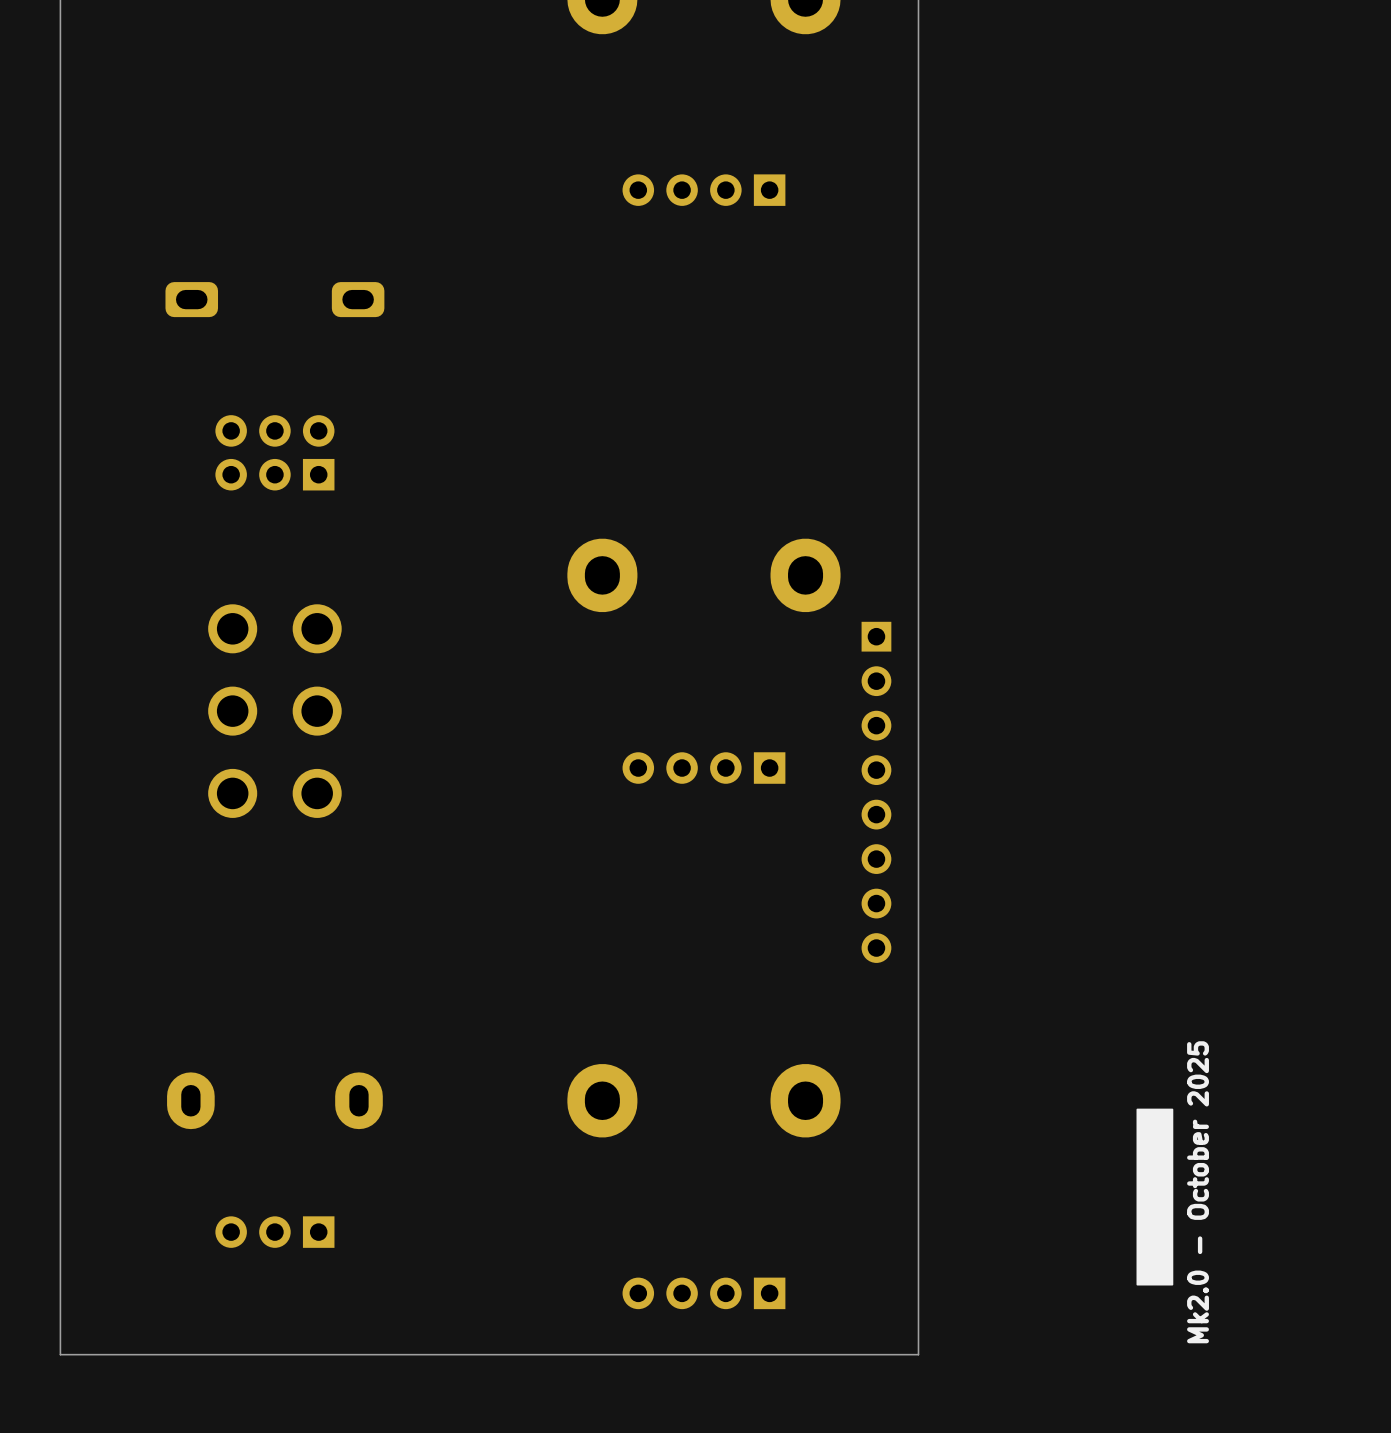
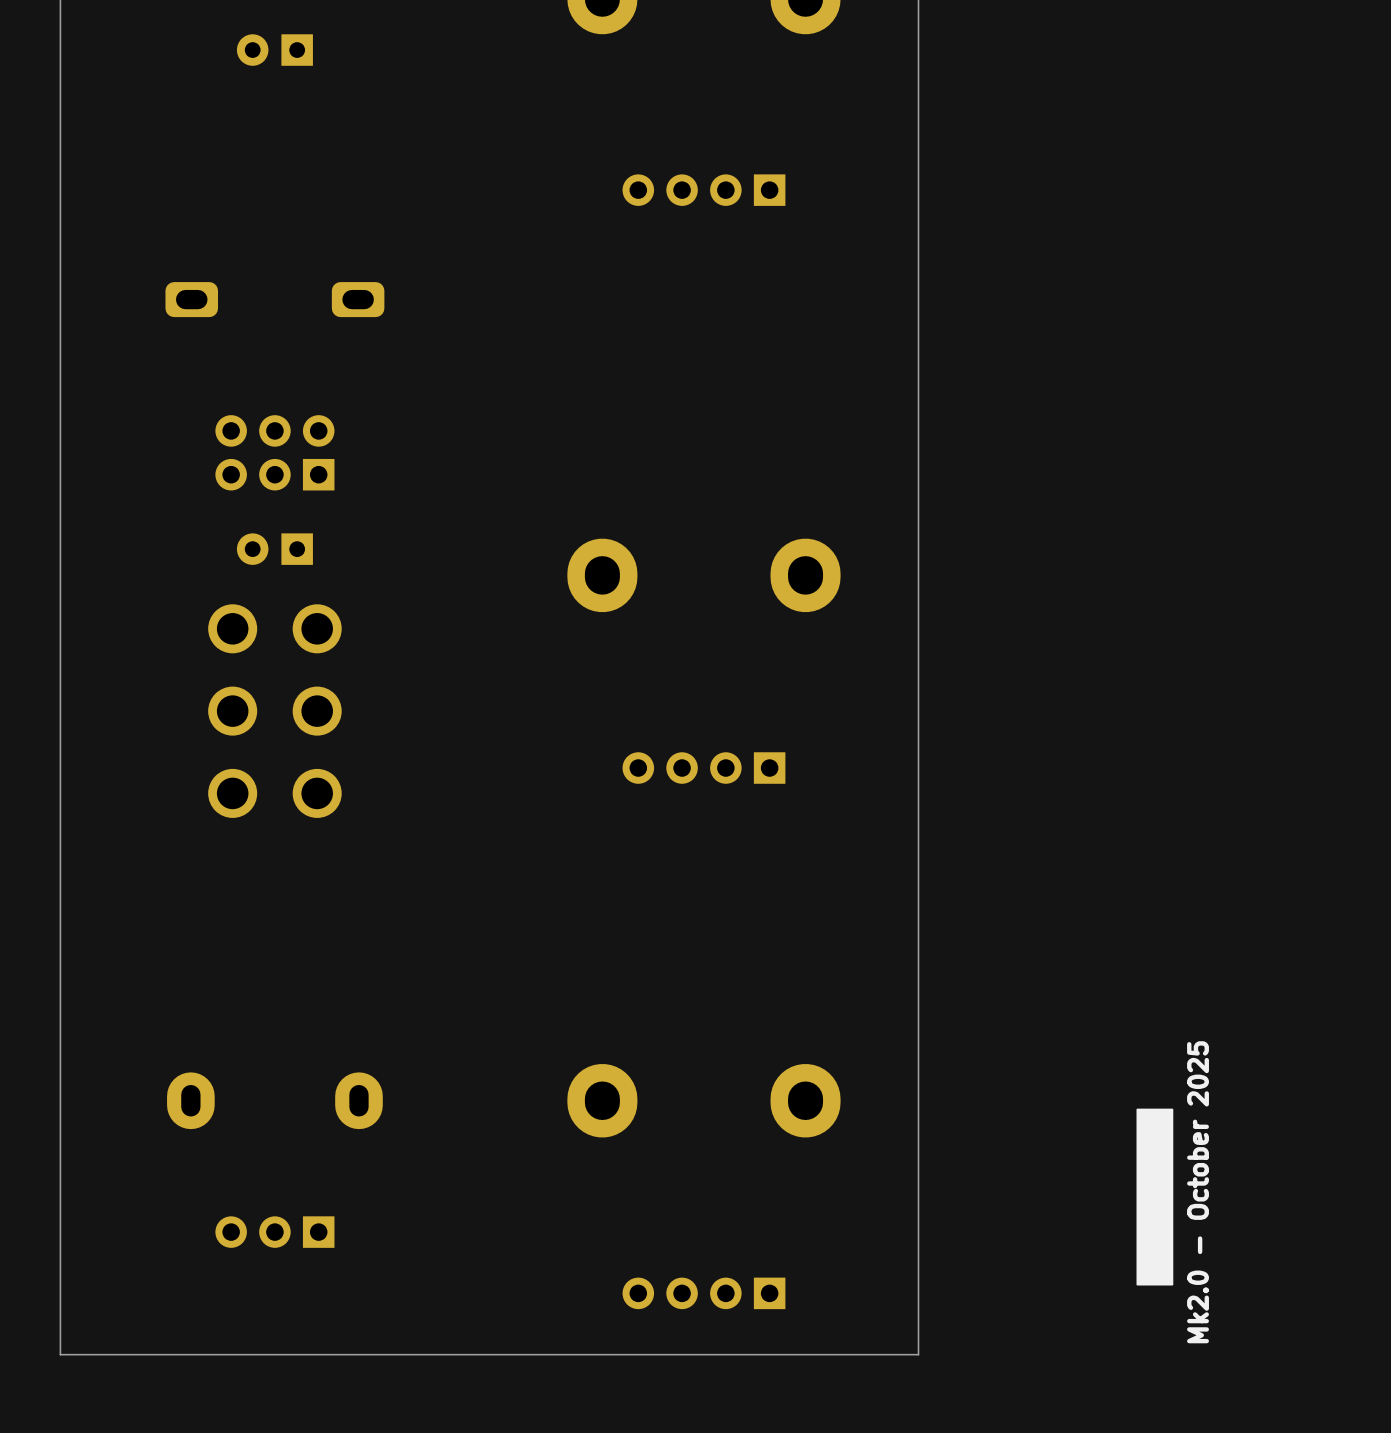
part: none -> (274, 50)
part: none -> (274, 549)
part: (876, 792) -> none

